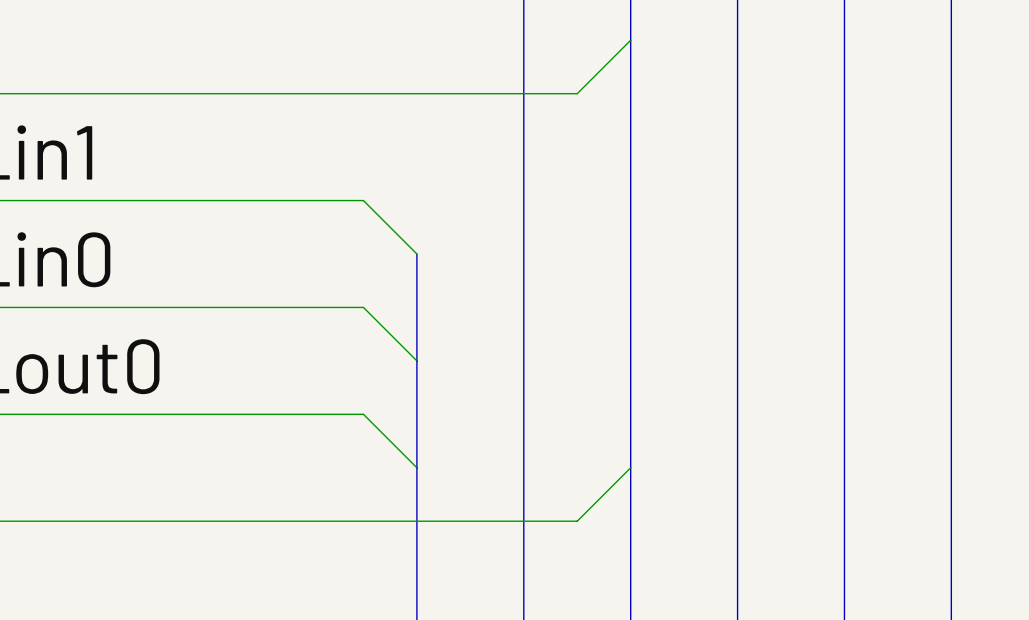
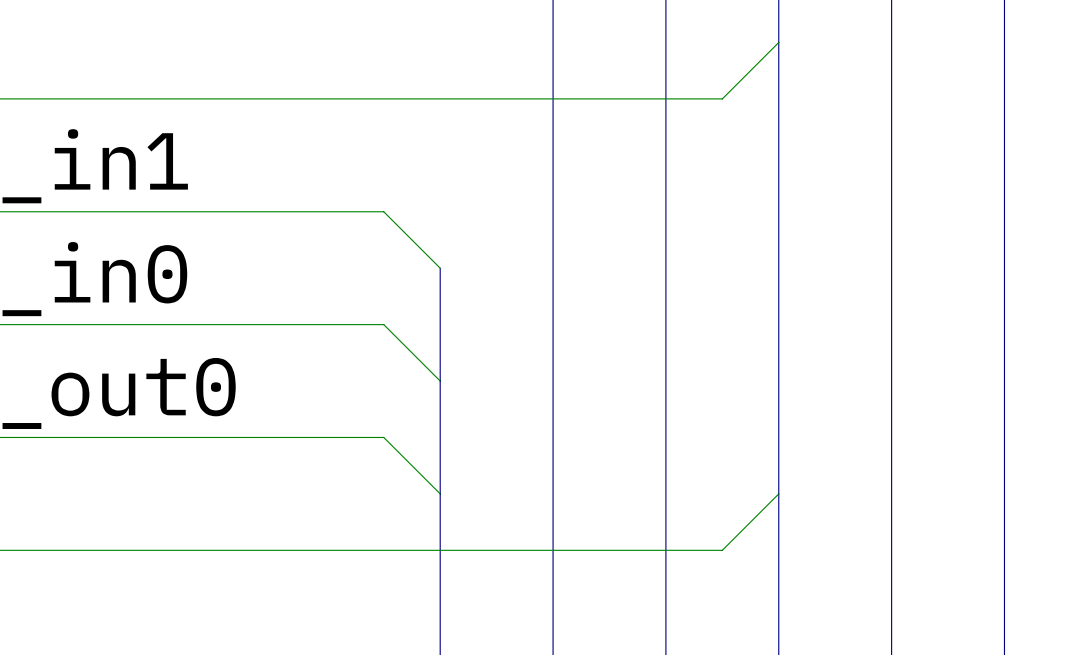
wire: (630, 40) (577, 93) -> (778, 42) (722, 98) (609, 98)
wire: (630, 467) (577, 521) -> (778, 493) (722, 550) (609, 550)

